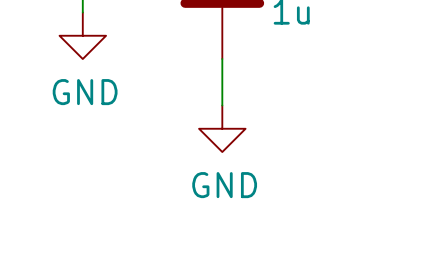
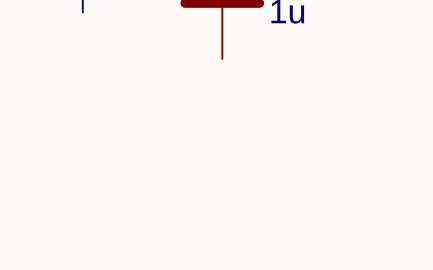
power symbol: GND (82, 35) -> none
wire: (222, 59) (222, 105) -> none
power symbol: GND (222, 128) -> none

